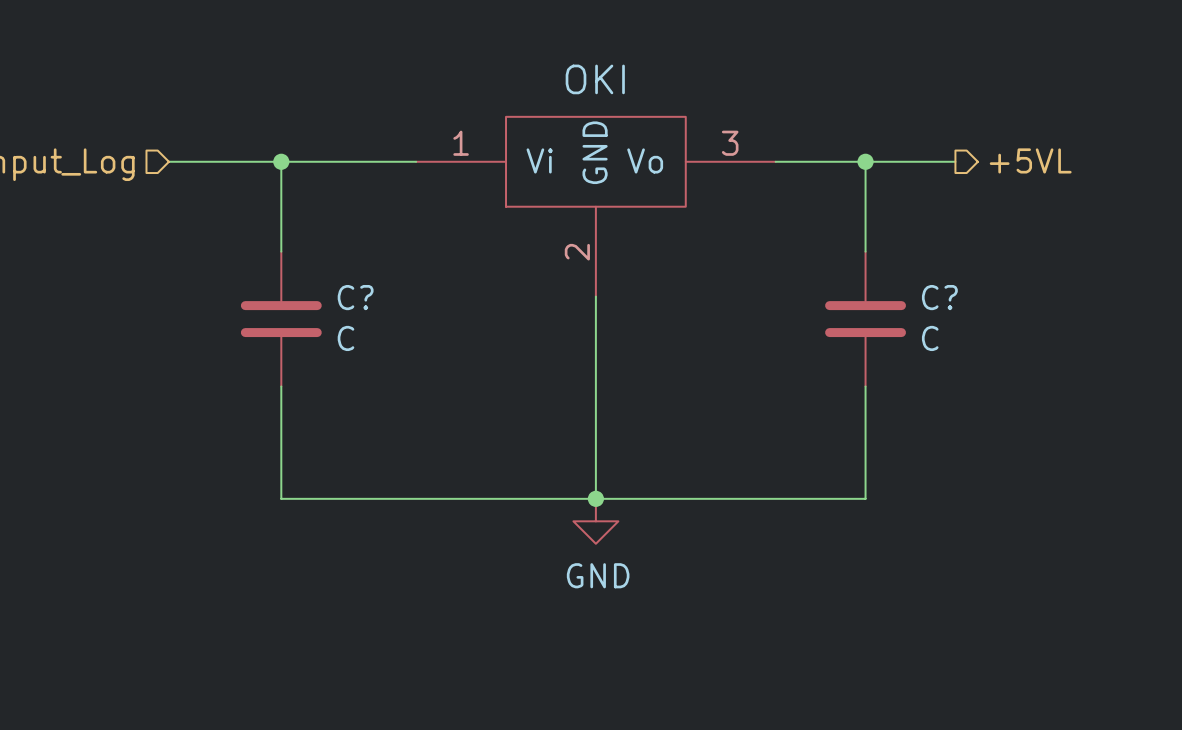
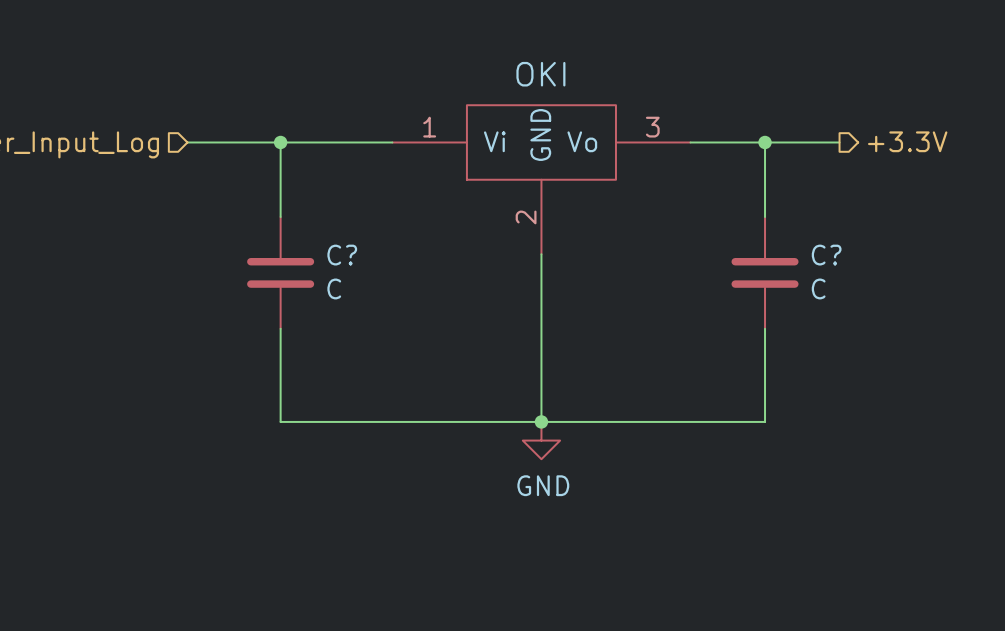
hierarchical label: +5VL (1030, 160) -> +3.3V (907, 141)

